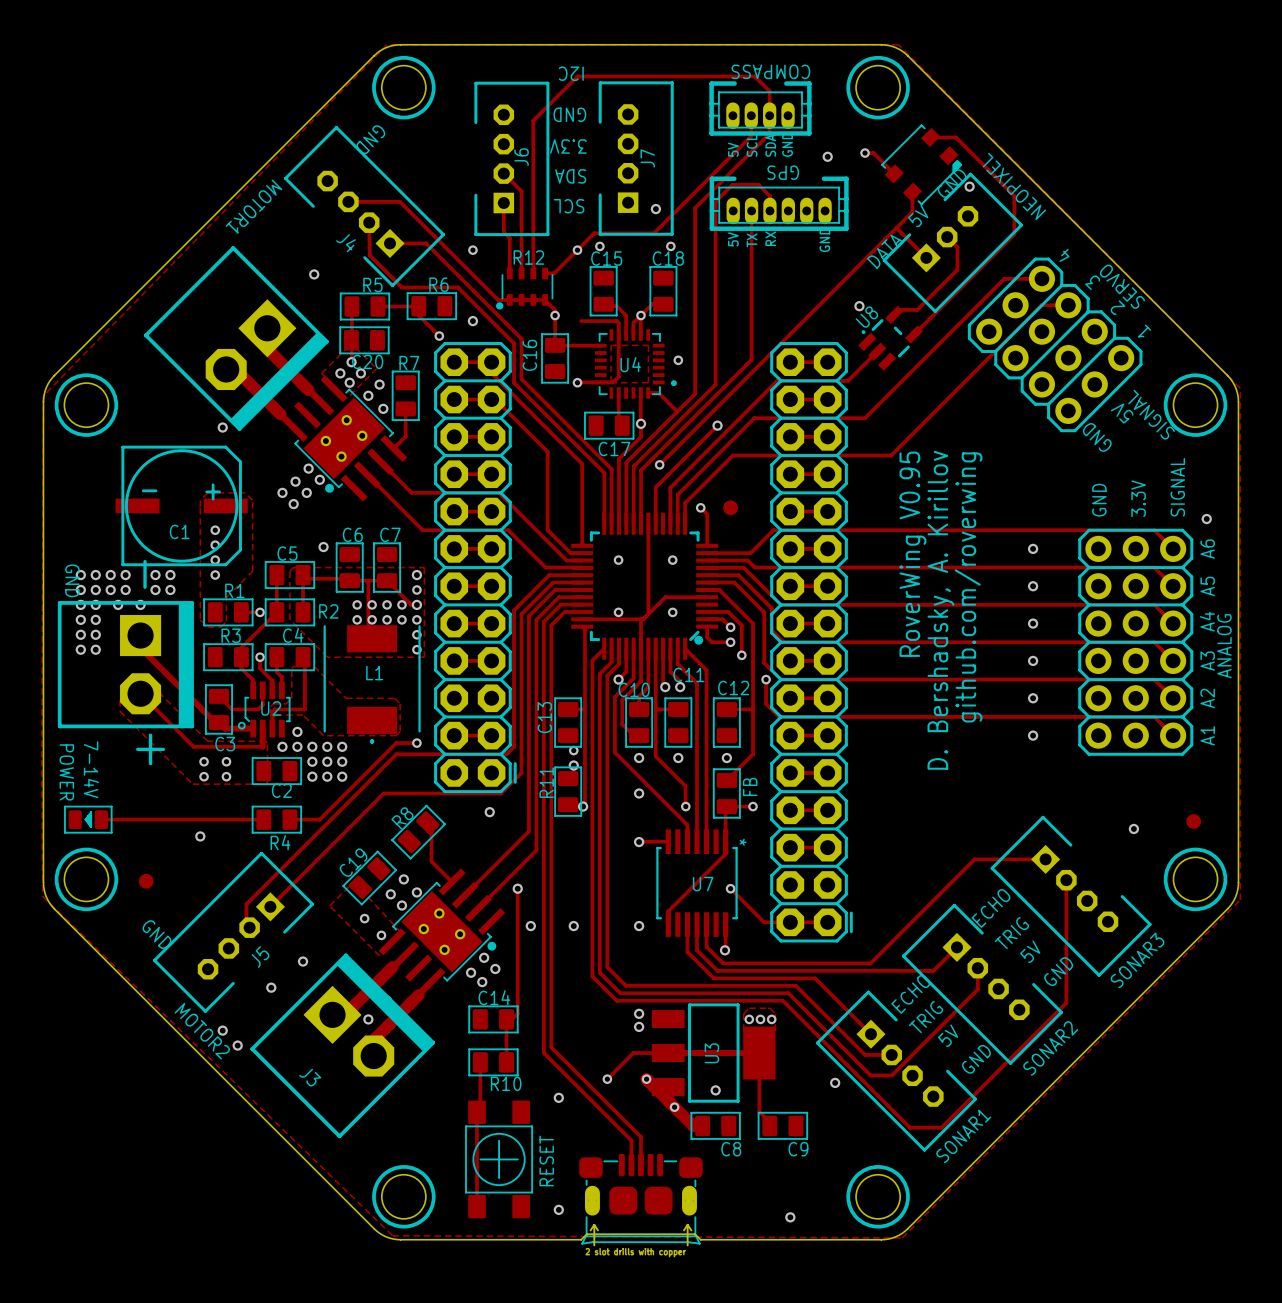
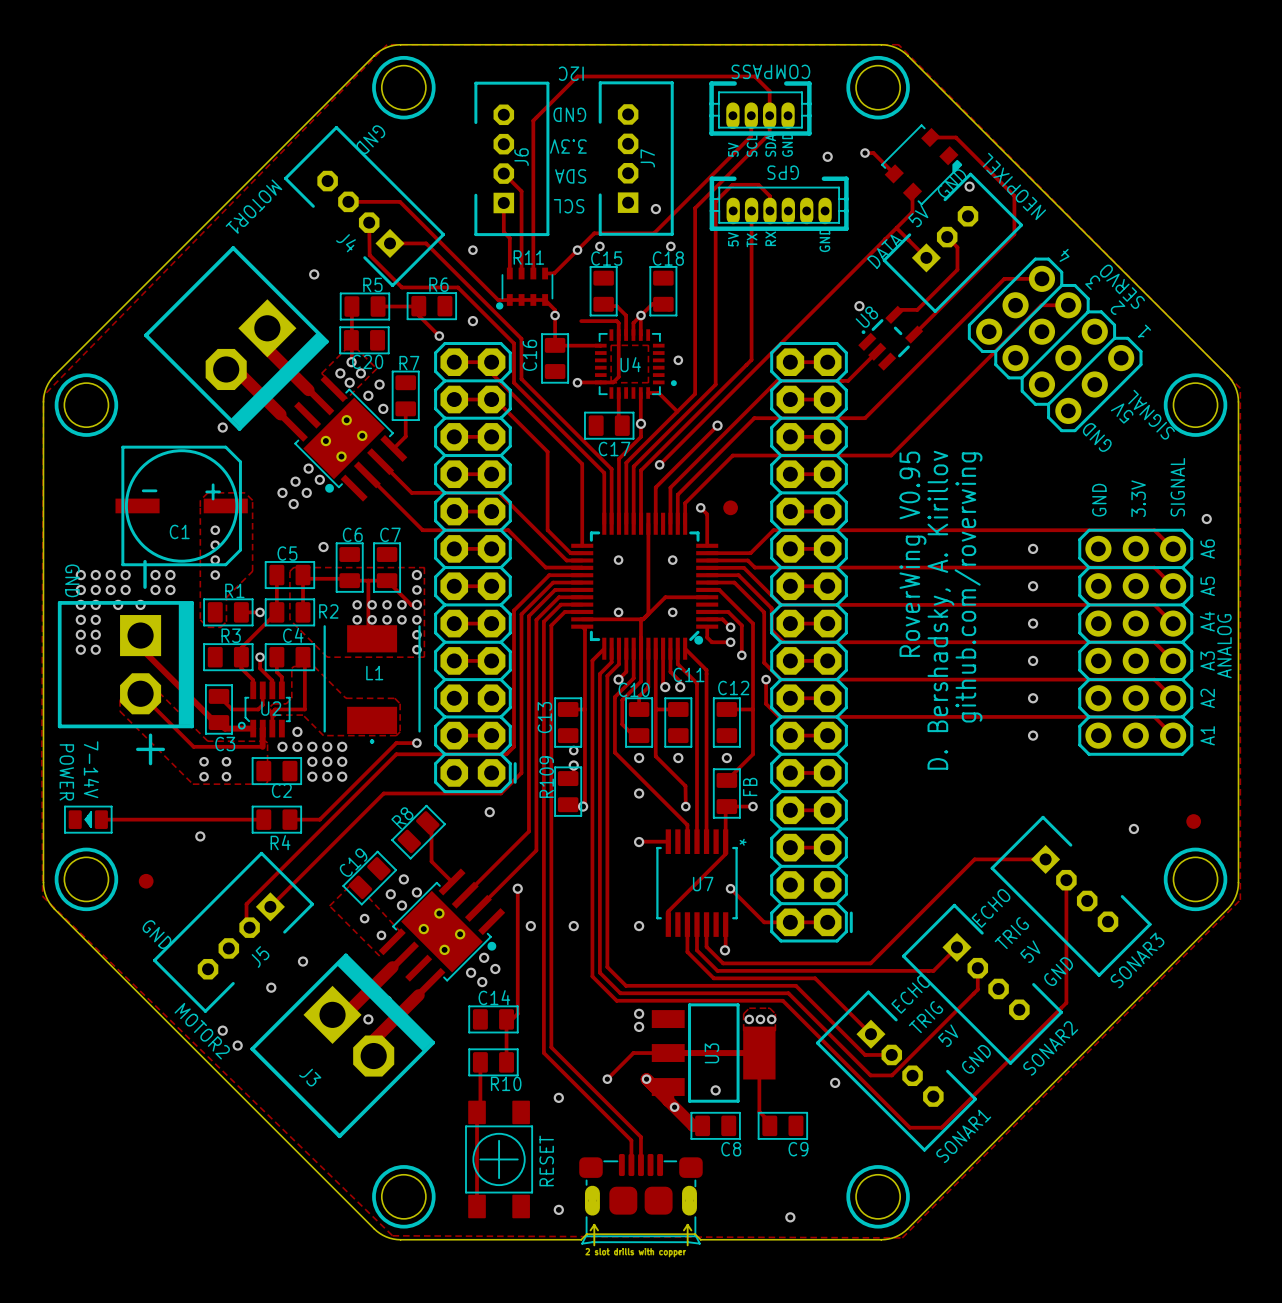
R12 name: R12 (528, 257) -> R11 (528, 257)
R11 name: R11 (546, 782) -> R109 (546, 777)

